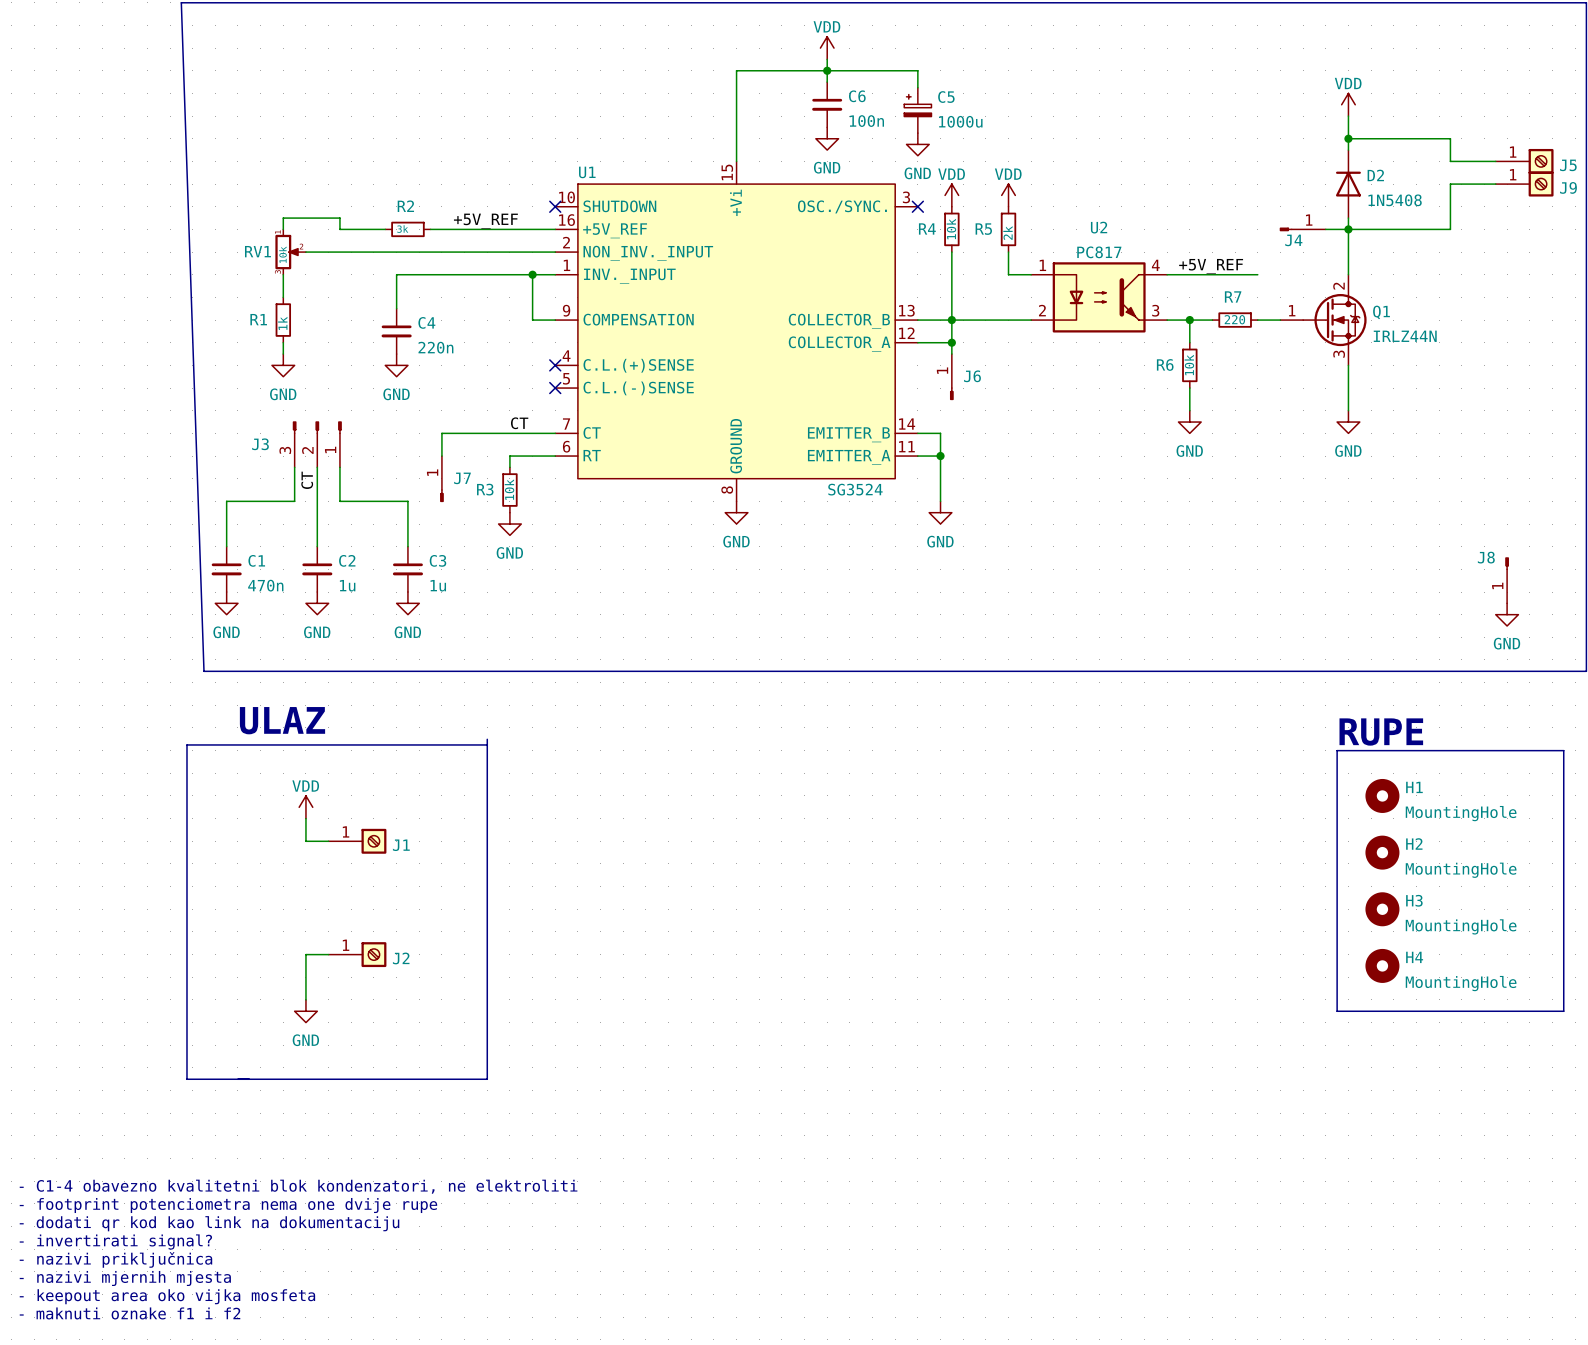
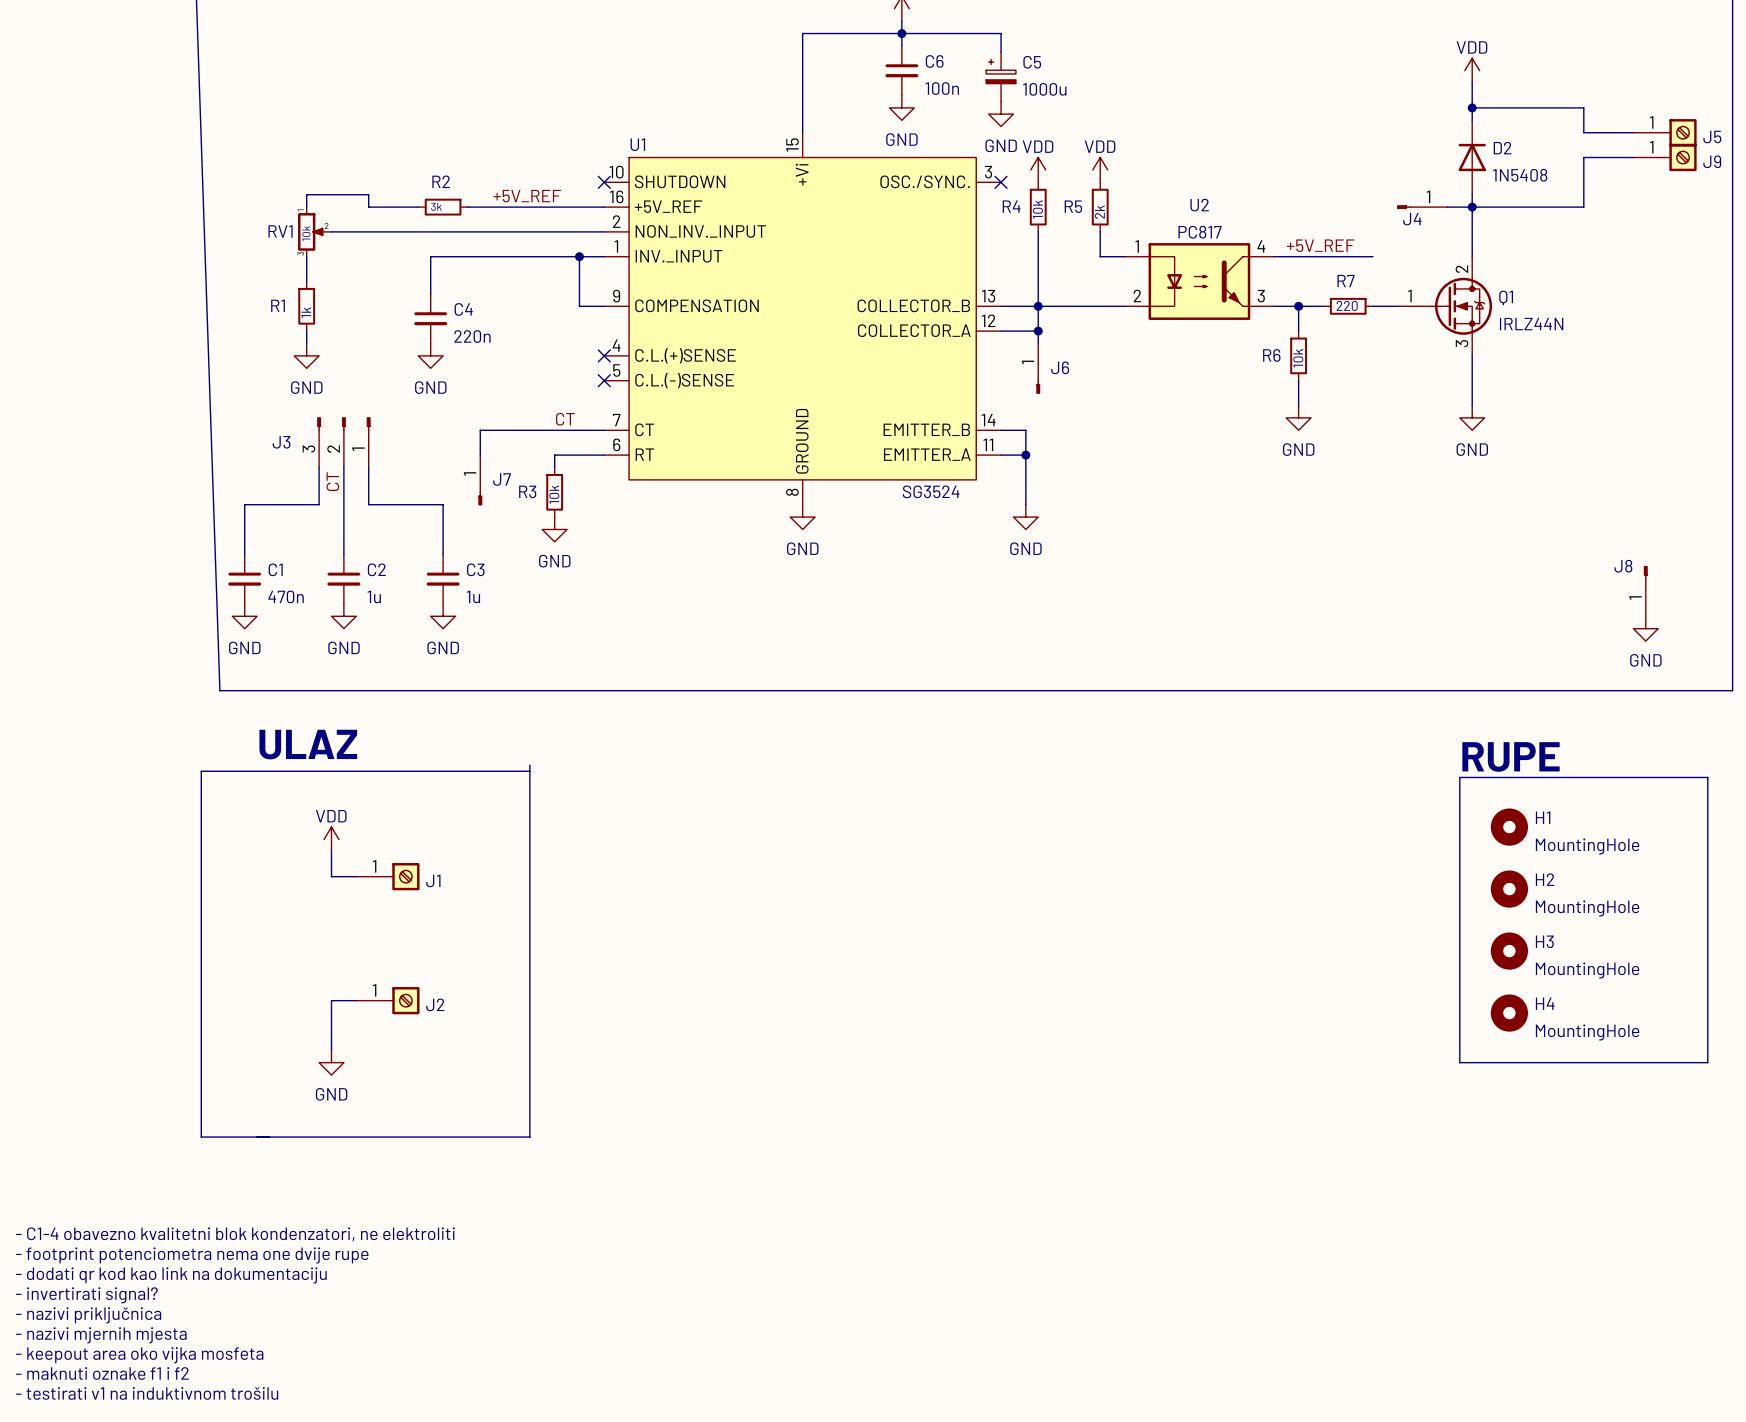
text: none -> - C1-4 obavezno kvalitetni blok kondenzatori, ne elektroliti (235, 1234)
text: - C1-4 obavezno kvalitetni blok kondenzatori, ne elektroliti (298, 1186) -> - footprint potenciometra nema one dvije rupe (192, 1255)
text: - footprint potenciometra nema one dvije rupe (228, 1205) -> - dodati qr kod kao link na dokumentaciju (171, 1275)
text: - dodati qr kod kao link na dokumentaciju (209, 1223) -> - invertirati signal? (86, 1295)
text: - invertirati signal? (115, 1242) -> - nazivi priključnica (88, 1315)
text: - nazivi priključnica (115, 1259) -> - nazivi mjernih mjesta (101, 1335)
text: - nazivi mjernih mjesta (125, 1278) -> - keepout area oko vijka mosfeta (139, 1355)
text: - keepout area oko vijka mosfeta (167, 1296) -> - maknuti oznake f1 i f2 (102, 1373)
text: - maknuti oznake f1 i f2 (130, 1313) -> - testirati v1 na induktivnom trošilu (147, 1393)

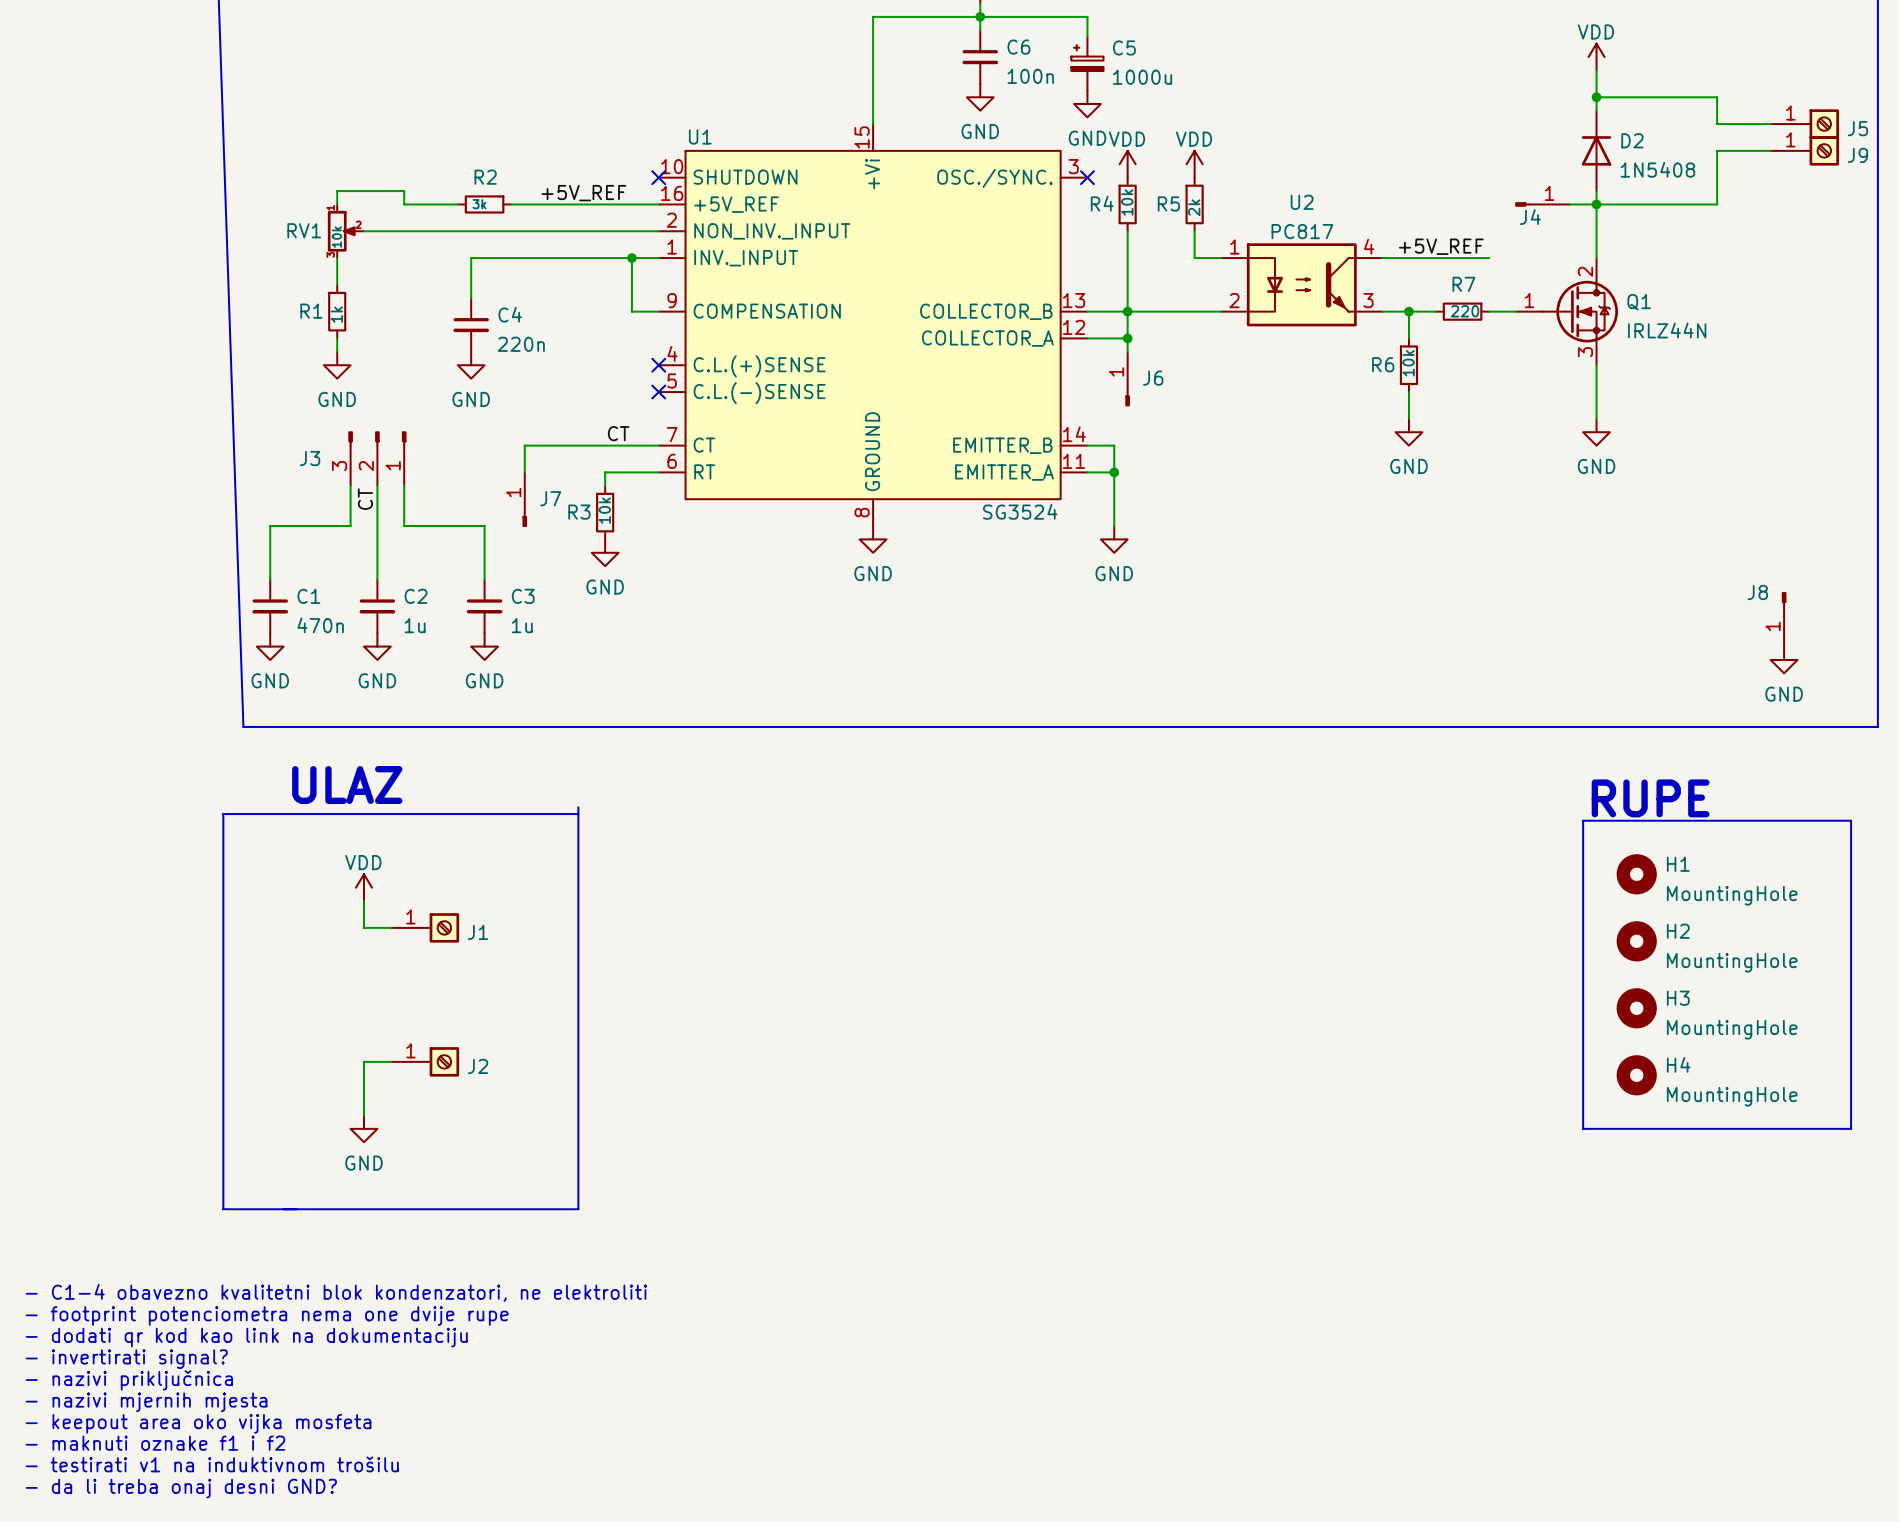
text: none -> - C1-4 obavezno kvalitetni blok kondenzatori, ne elektroliti (336, 1292)
text: - C1-4 obavezno kvalitetni blok kondenzatori, ne elektroliti (235, 1234) -> - footprint potenciometra nema one dvije rupe (267, 1315)
text: - footprint potenciometra nema one dvije rupe (192, 1255) -> - dodati qr kod kao link na dokumentaciju (246, 1337)
text: - dodati qr kod kao link na dokumentaciju (171, 1275) -> - invertirati signal? (126, 1359)
text: - invertirati signal? (86, 1295) -> - nazivi priključnica (129, 1380)
text: - nazivi priključnica (88, 1315) -> - nazivi mjernih mjesta (146, 1402)
text: - nazivi mjernih mjesta (101, 1335) -> - keepout area oko vijka mosfeta (198, 1423)
text: - keepout area oko vijka mosfeta (139, 1355) -> - maknuti oznake f1 i f2 (155, 1443)
text: - maknuti oznake f1 i f2 (102, 1373) -> - testirati v1 na induktivnom trošilu (212, 1464)
text: - testirati v1 na induktivnom trošilu (147, 1393) -> - da li treba onaj desni GND? (181, 1488)

